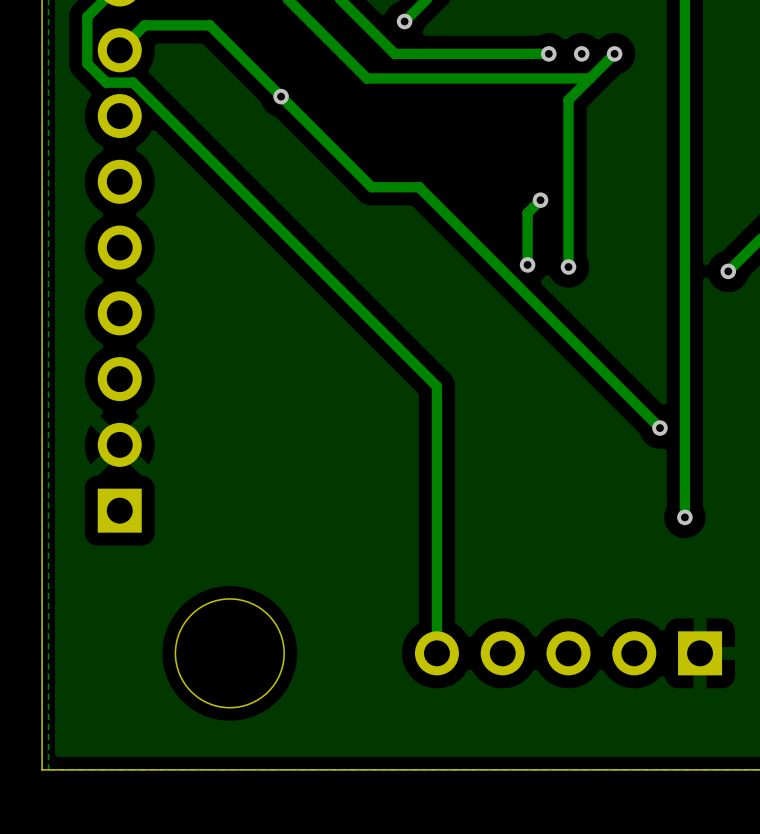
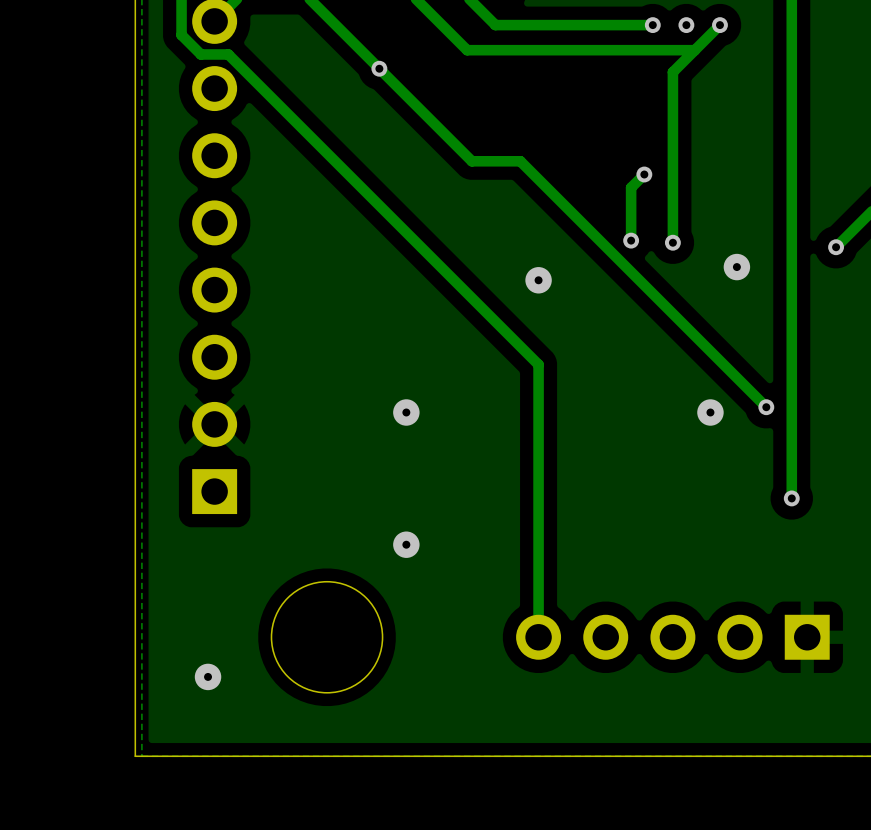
via: none -> (736, 267)
via: none -> (538, 280)
via: none -> (406, 412)
via: none -> (710, 412)
via: none -> (406, 544)
via: none -> (208, 676)

